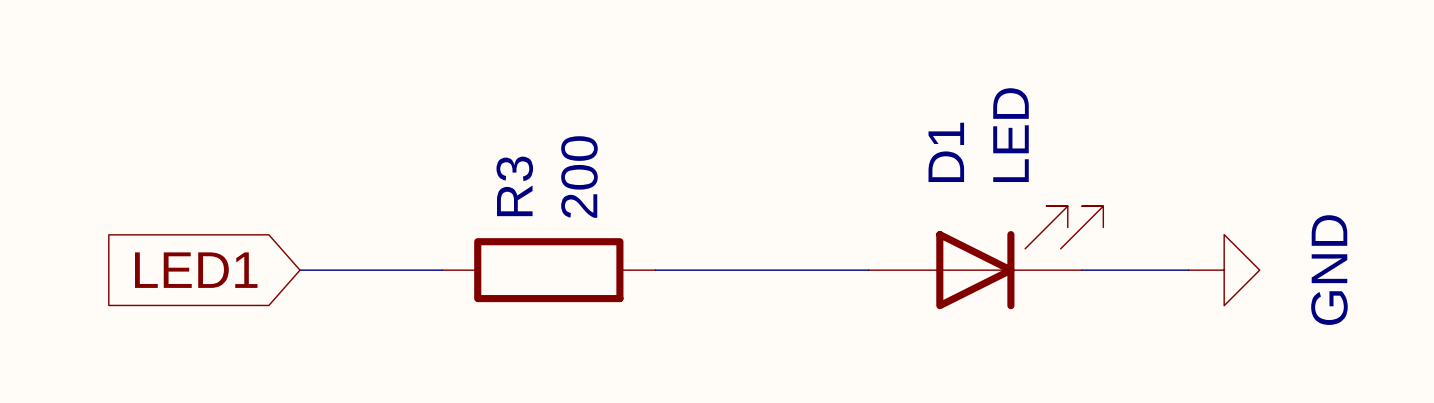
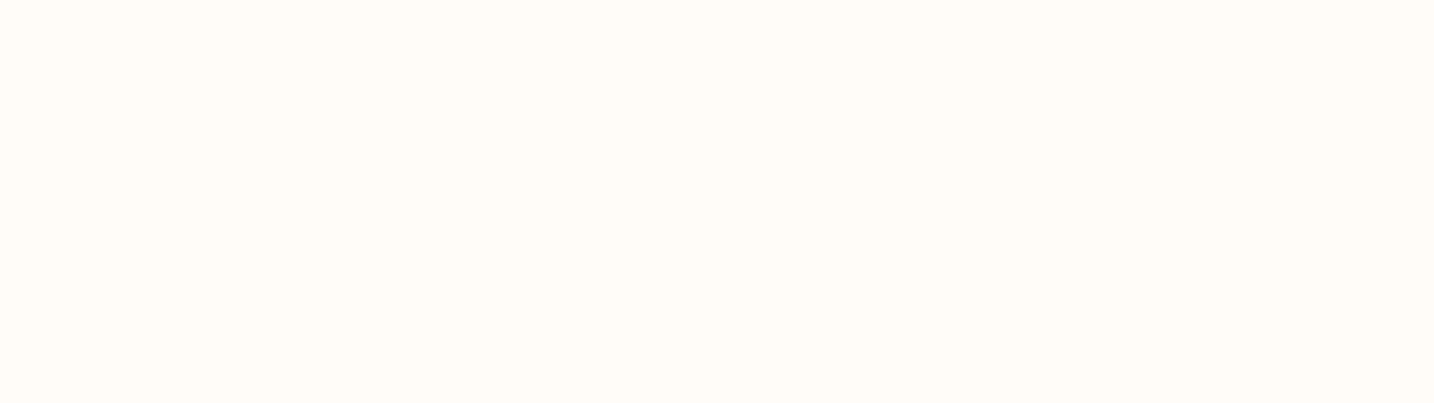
D1: LED (986, 257) -> none
global label: LED1 (196, 270) -> none
wire: (300, 270) (442, 270) -> none
R3: 200 (548, 270) -> none
wire: (655, 270) (868, 270) -> none
wire: (1081, 270) (1188, 270) -> none
power symbol: GND (1224, 270) -> none

